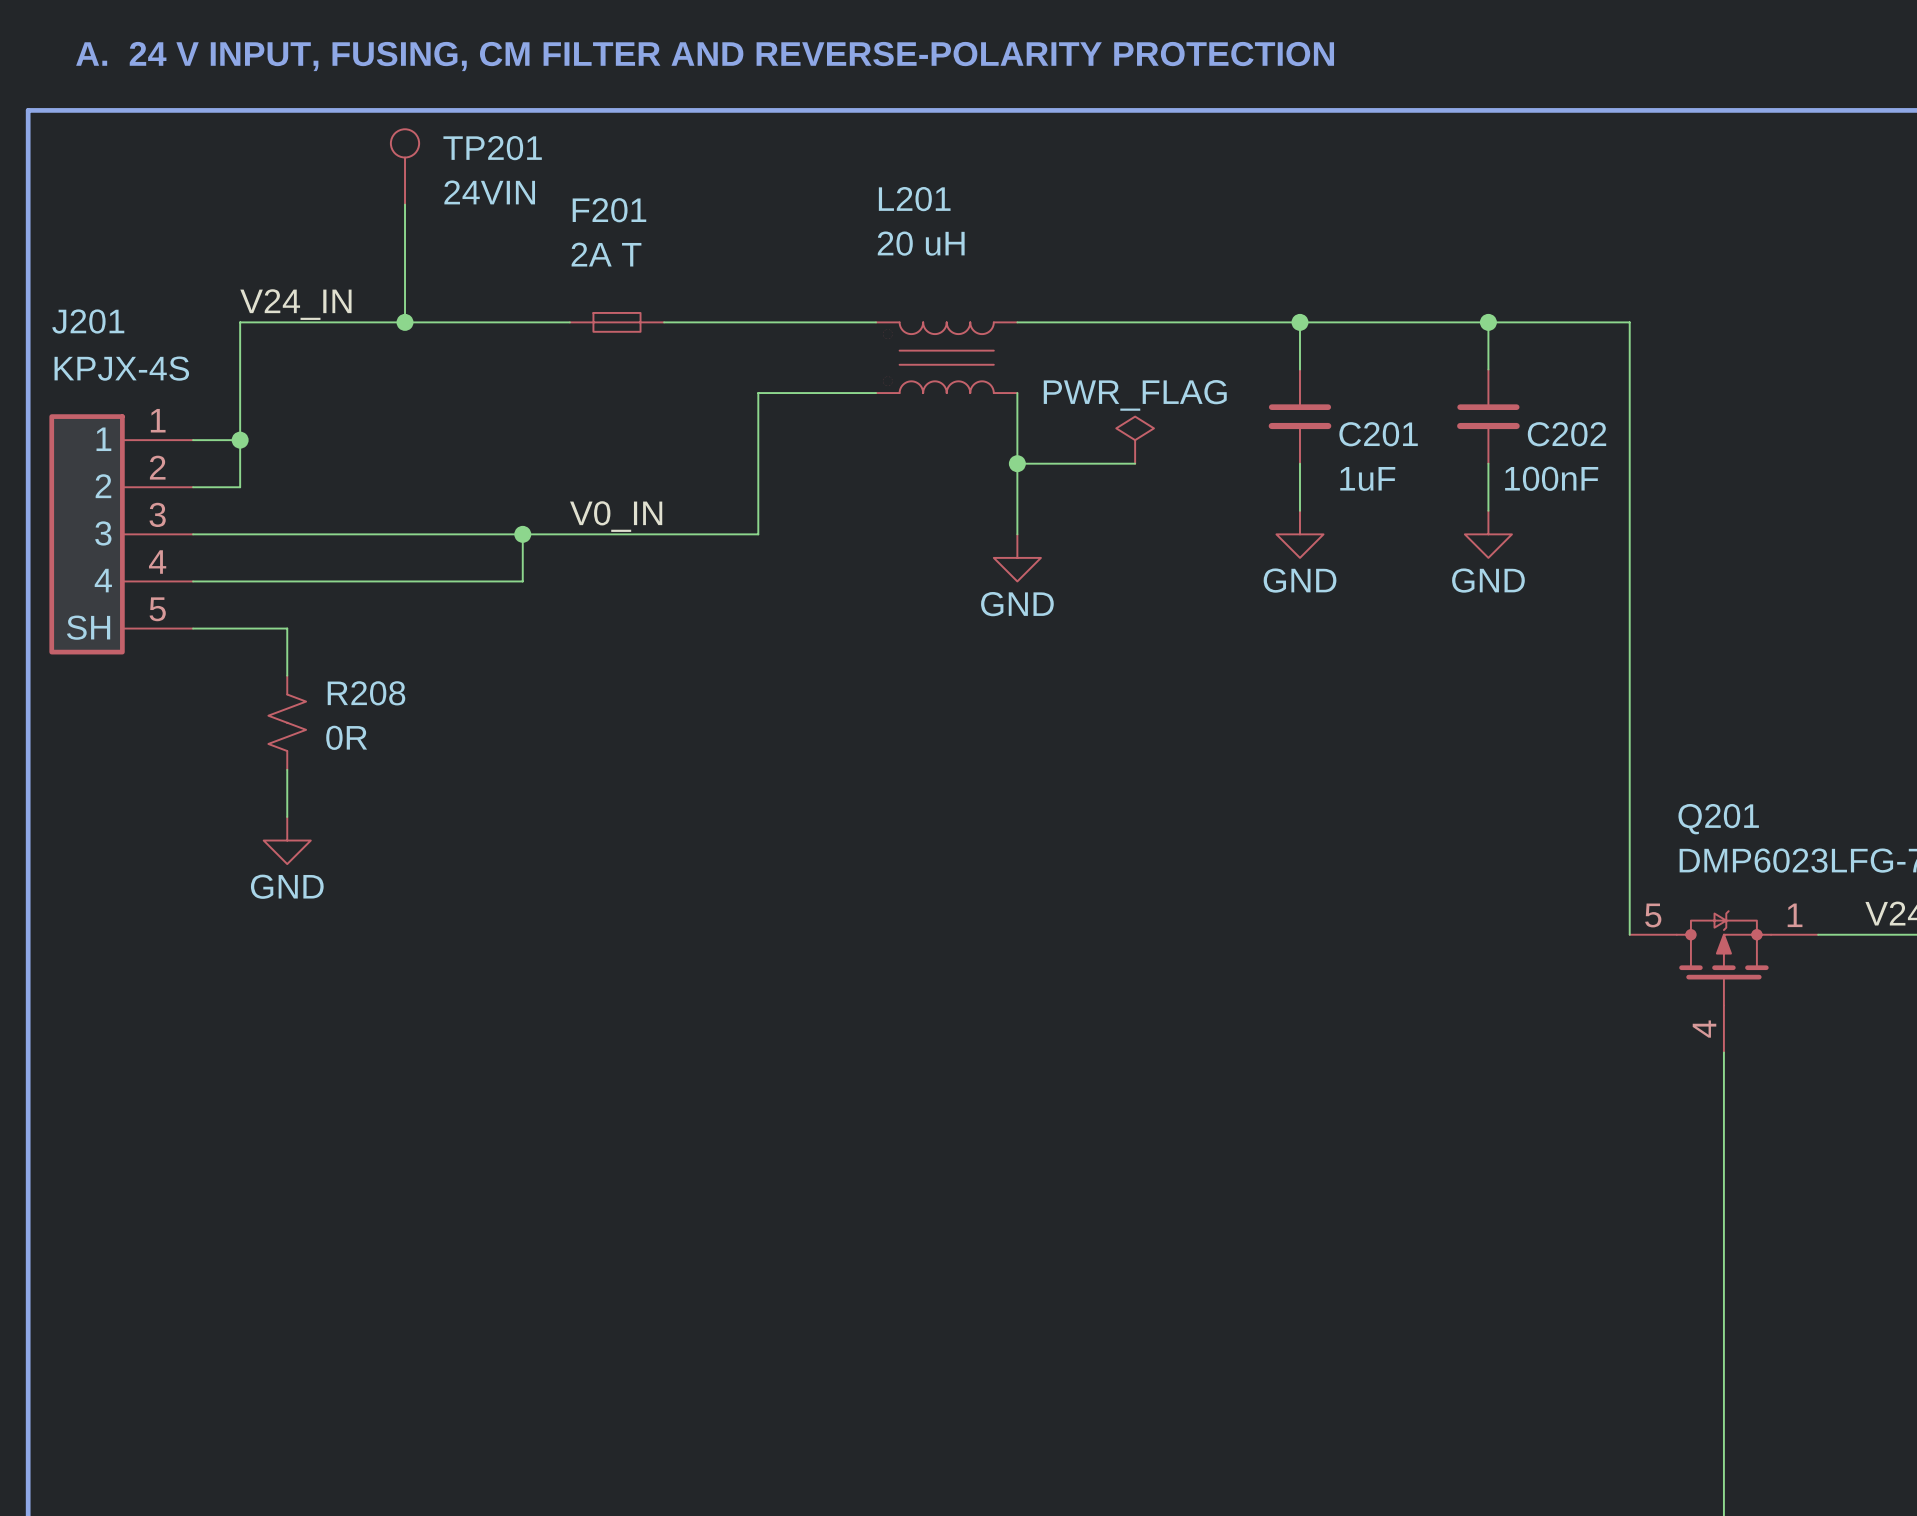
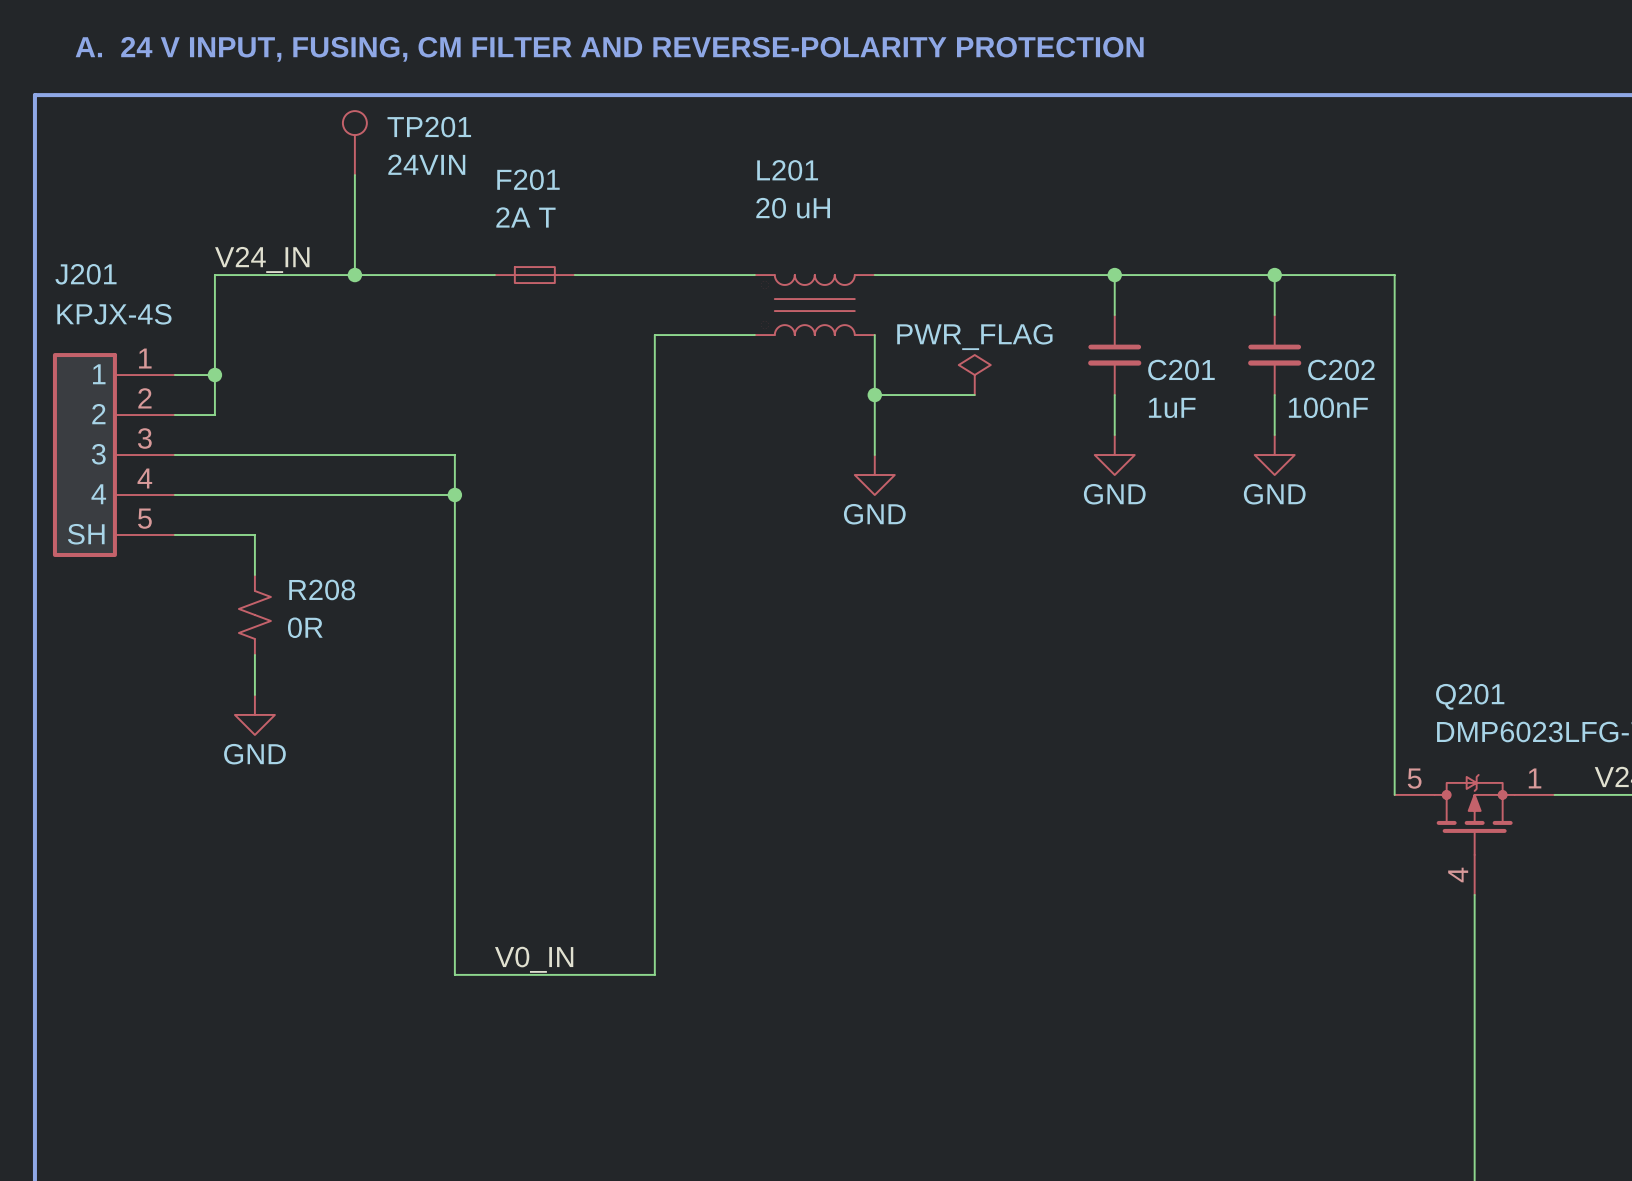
label: V0_IN (616, 516) -> none
wire: (522, 534) (758, 534) -> (454, 495) (454, 974) (654, 974) (654, 455)
junction position: (522, 534) -> (454, 495)
label: none -> V0_IN (534, 959)

